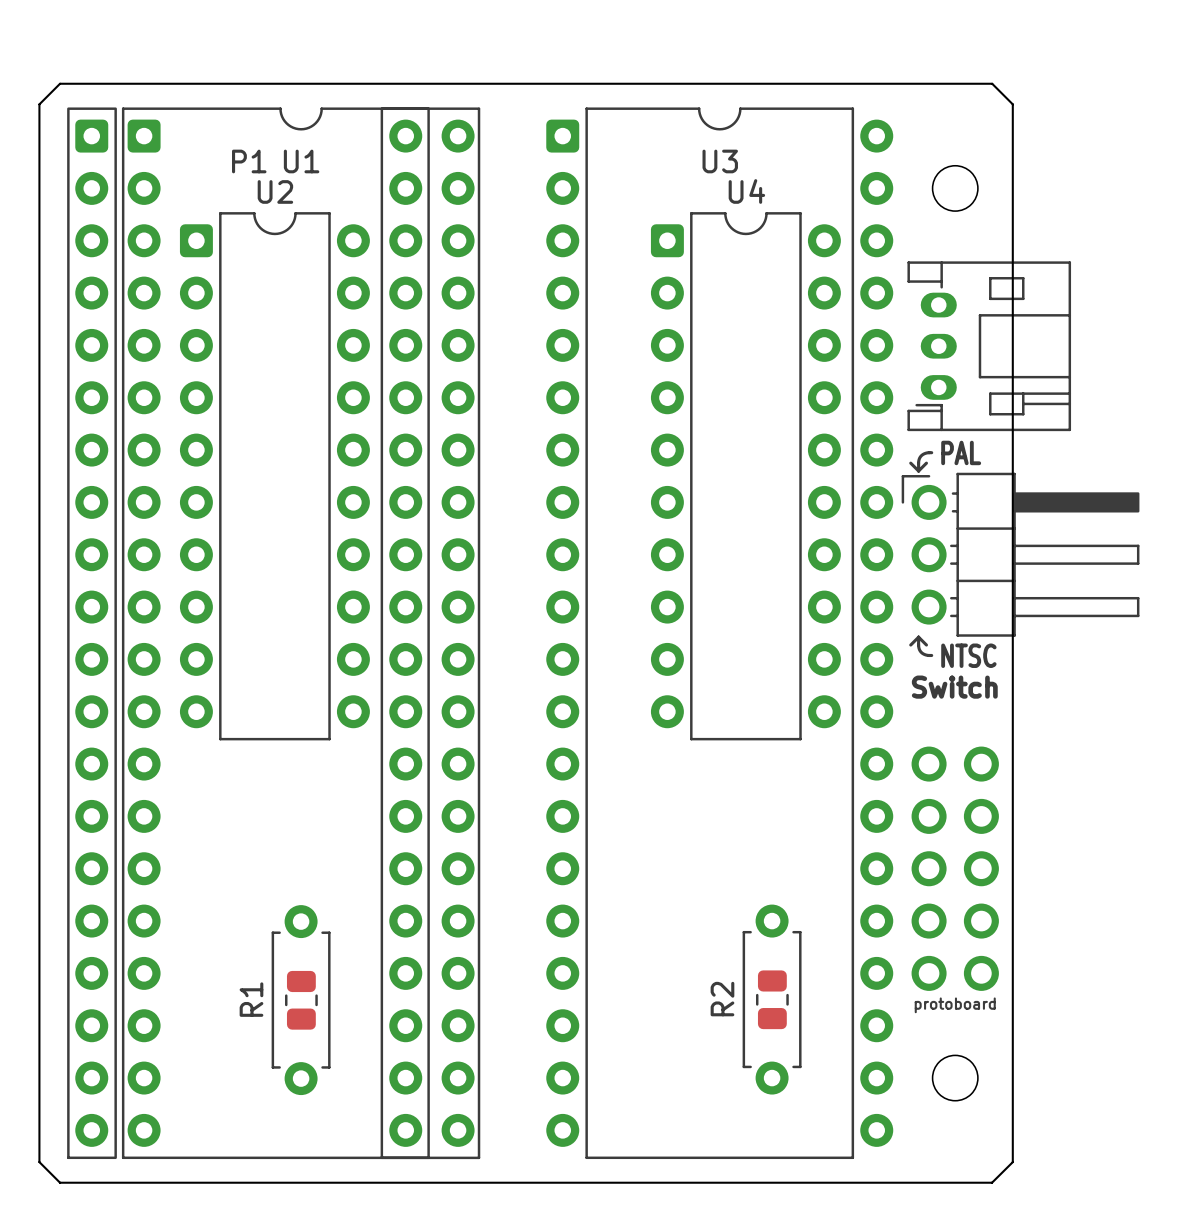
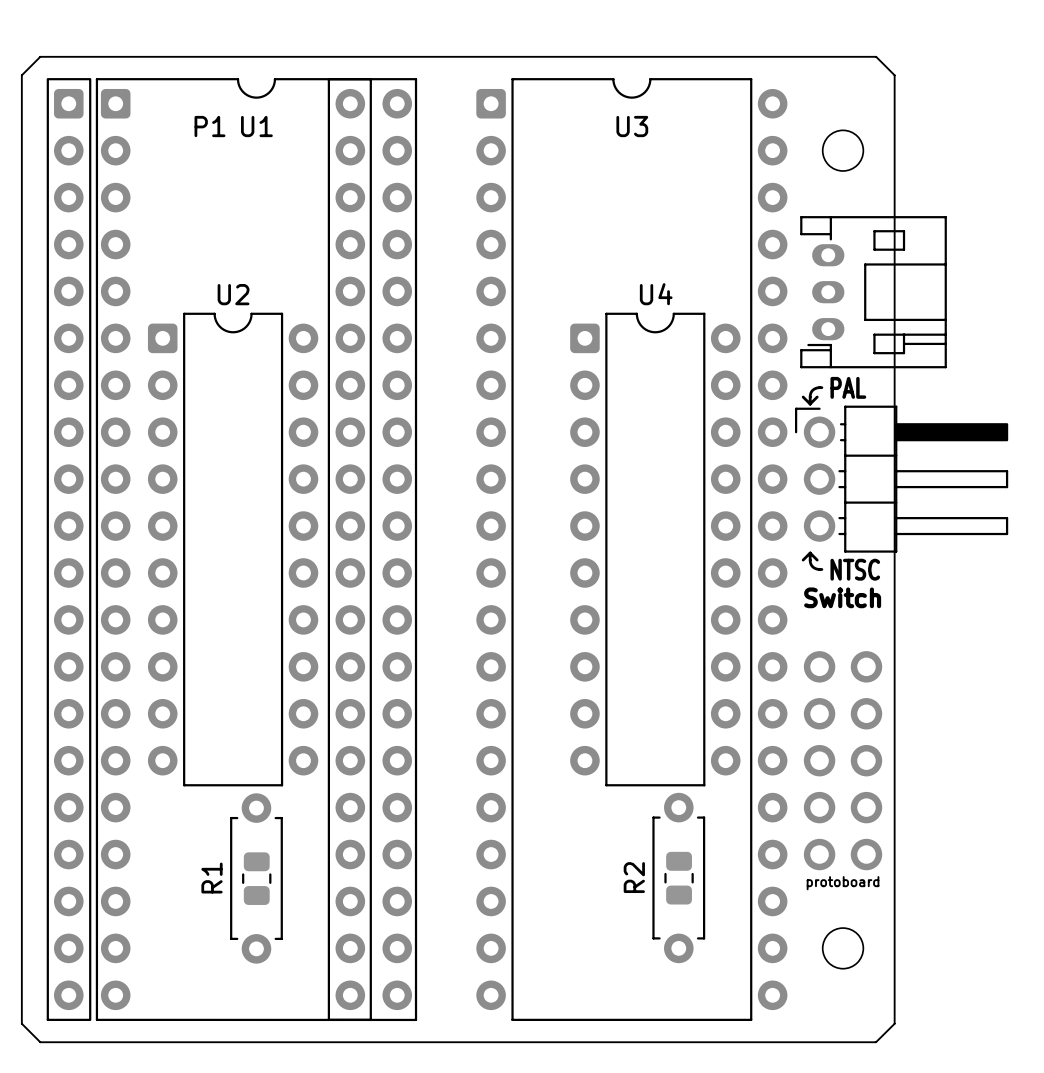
U2 position: (274, 476) -> (233, 549)
U4 position: (745, 476) -> (655, 549)

